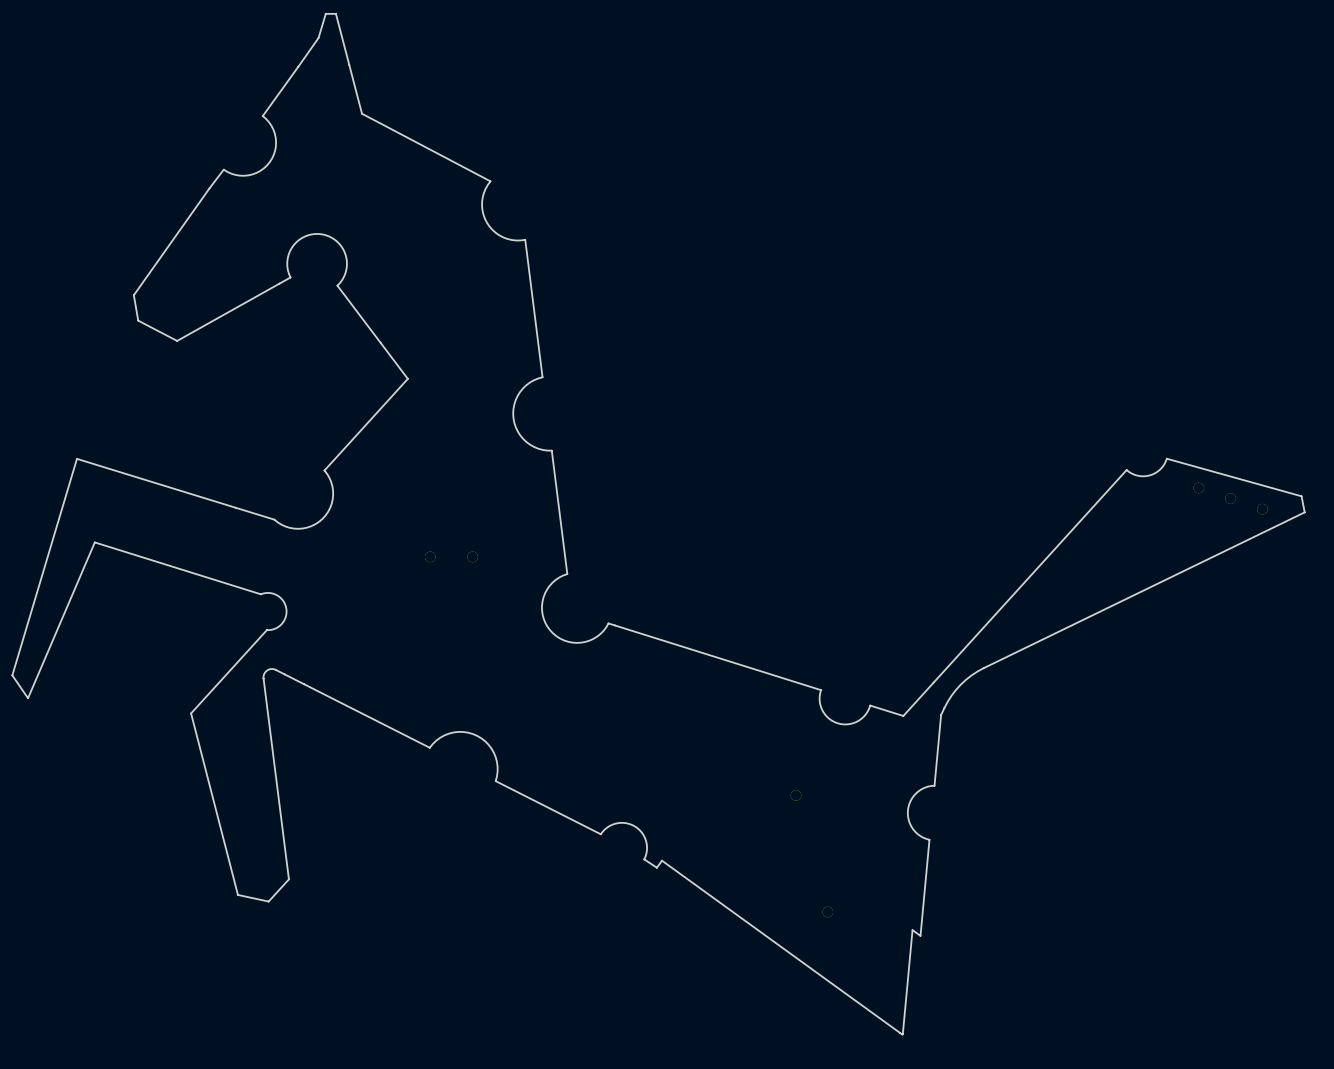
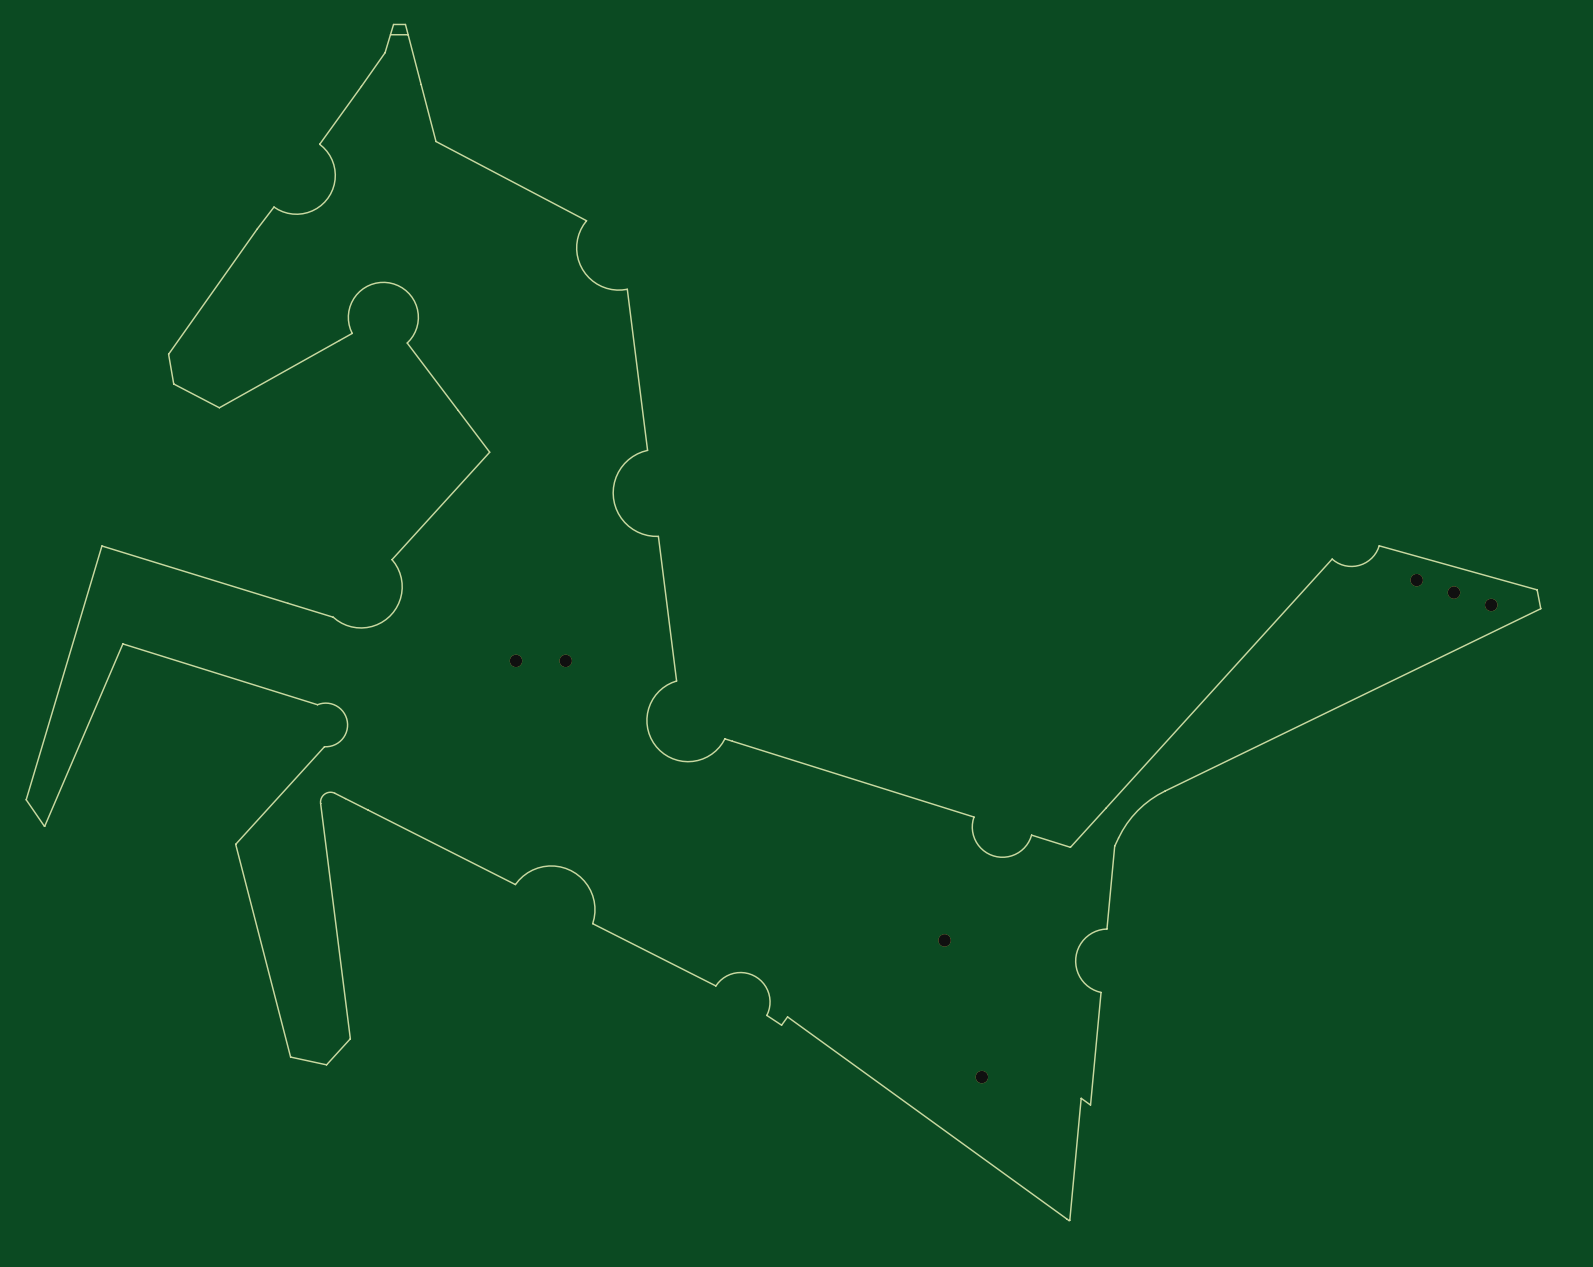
board edge: none -> (407, 34) (390, 34)

